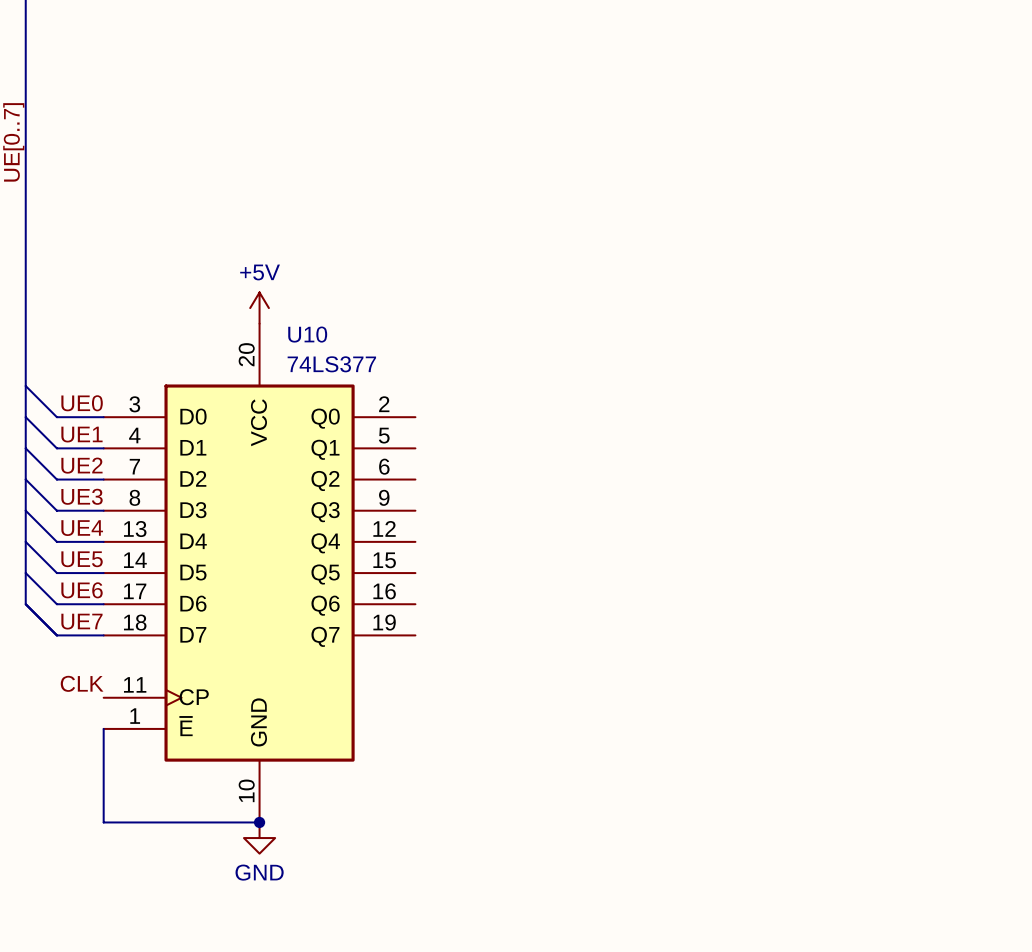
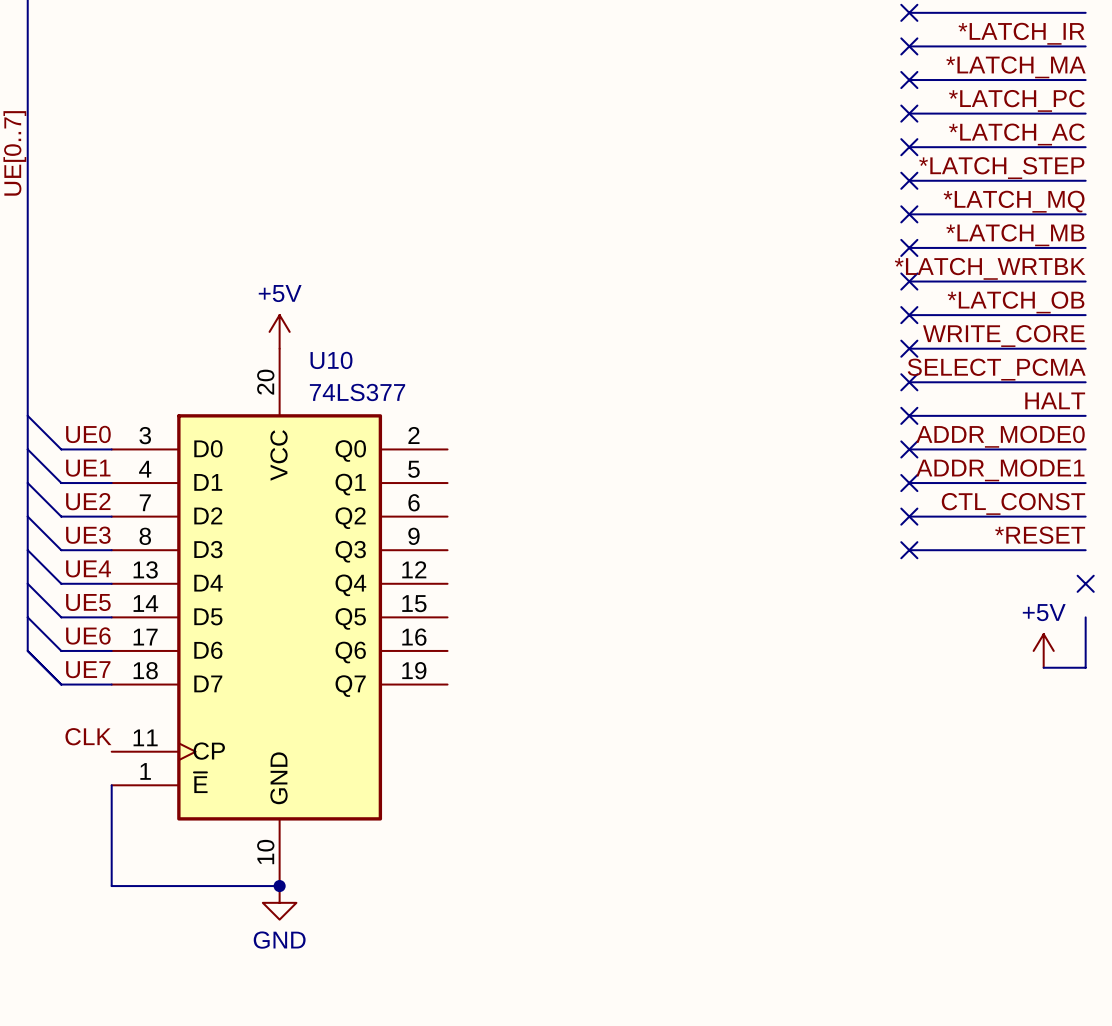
wire: none -> (909, 12) (1085, 12)
no-connect mark: none -> (909, 12)
label: none -> *LATCH_IR (1021, 33)
wire: none -> (909, 46) (1085, 46)
no-connect mark: none -> (909, 46)
label: none -> *LATCH_MA (1015, 67)
wire: none -> (909, 80) (1085, 80)
no-connect mark: none -> (909, 80)
label: none -> *LATCH_PC (1016, 100)
wire: none -> (909, 113) (1085, 113)
no-connect mark: none -> (909, 113)
label: none -> *LATCH_AC (1016, 134)
wire: none -> (909, 147) (1085, 147)
no-connect mark: none -> (909, 147)
label: none -> *LATCH_STEP (1001, 168)
wire: none -> (909, 180) (1085, 180)
no-connect mark: none -> (909, 180)
label: none -> *LATCH_MQ (1014, 201)
wire: none -> (909, 214) (1085, 214)
no-connect mark: none -> (909, 214)
label: none -> *LATCH_MB (1015, 235)
wire: none -> (909, 247) (1085, 247)
no-connect mark: none -> (909, 247)
label: none -> *LATCH_WRTBK (990, 268)
wire: none -> (909, 281) (1085, 281)
no-connect mark: none -> (909, 281)
label: none -> *LATCH_OB (1016, 302)
wire: none -> (909, 315) (1085, 315)
no-connect mark: none -> (909, 315)
label: none -> WRITE_CORE (1003, 336)
wire: none -> (909, 348) (1085, 348)
no-connect mark: none -> (909, 348)
label: none -> SELECT_PCMA (996, 369)
wire: none -> (909, 382) (1085, 382)
no-connect mark: none -> (909, 382)
label: none -> HALT (1055, 400)
wire: none -> (909, 415) (1085, 415)
no-connect mark: none -> (909, 415)
label: none -> ADDR_MODE0 (1000, 436)
wire: none -> (909, 449) (1085, 449)
no-connect mark: none -> (909, 449)
label: none -> ADDR_MODE1 (1000, 470)
wire: none -> (909, 483) (1085, 483)
no-connect mark: none -> (909, 483)
label: none -> CTL_CONST (1013, 503)
wire: none -> (909, 516) (1085, 516)
no-connect mark: none -> (909, 516)
label: none -> *RESET (1040, 535)
wire: none -> (909, 550) (1085, 550)
no-connect mark: none -> (909, 550)
no-connect mark: none -> (1085, 583)
wire: none -> (1085, 617) (1085, 667) (1043, 667)
power symbol: none -> +5V (1043, 650)

